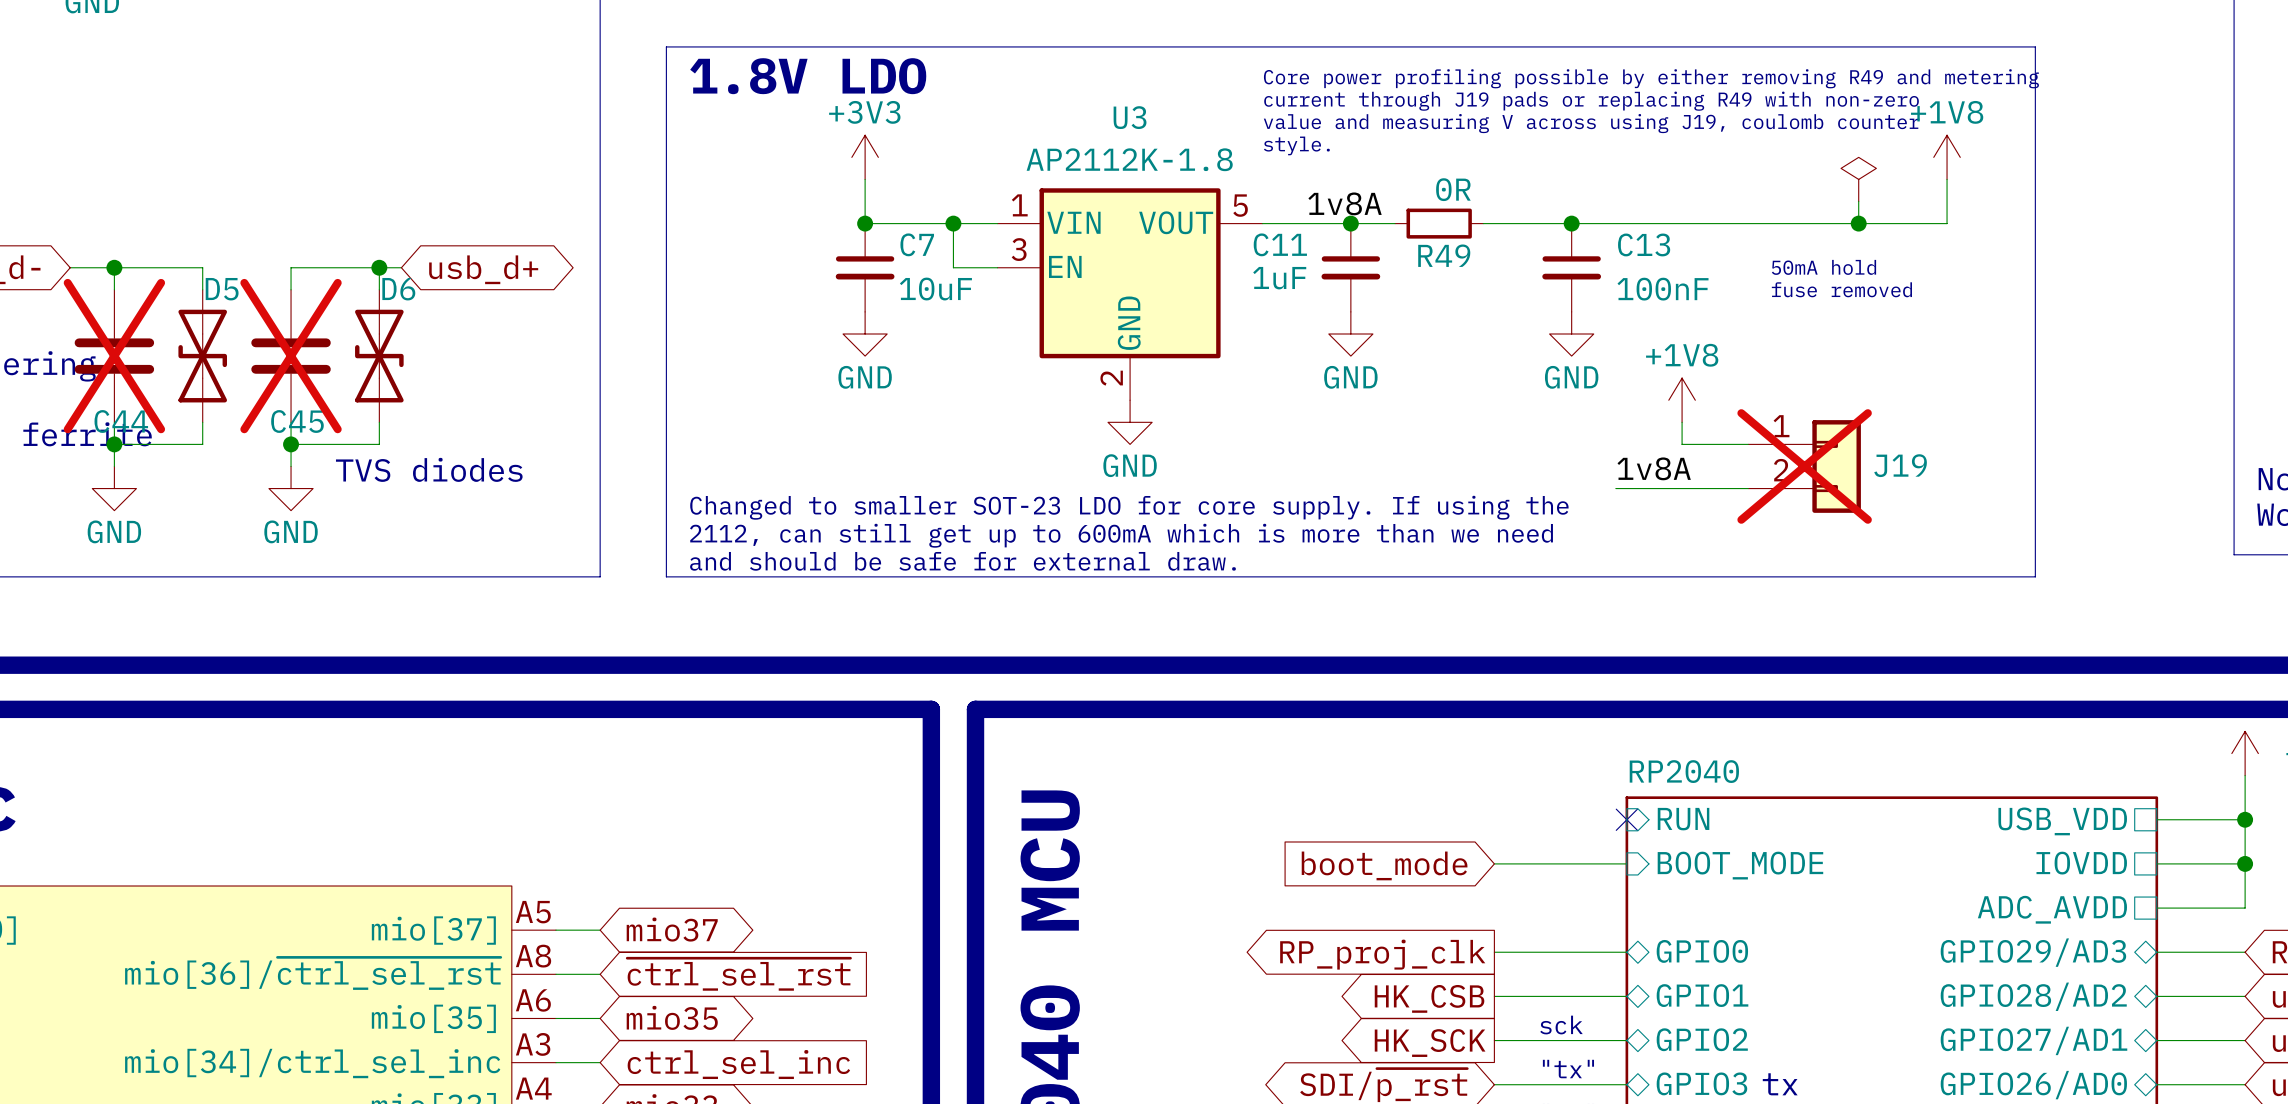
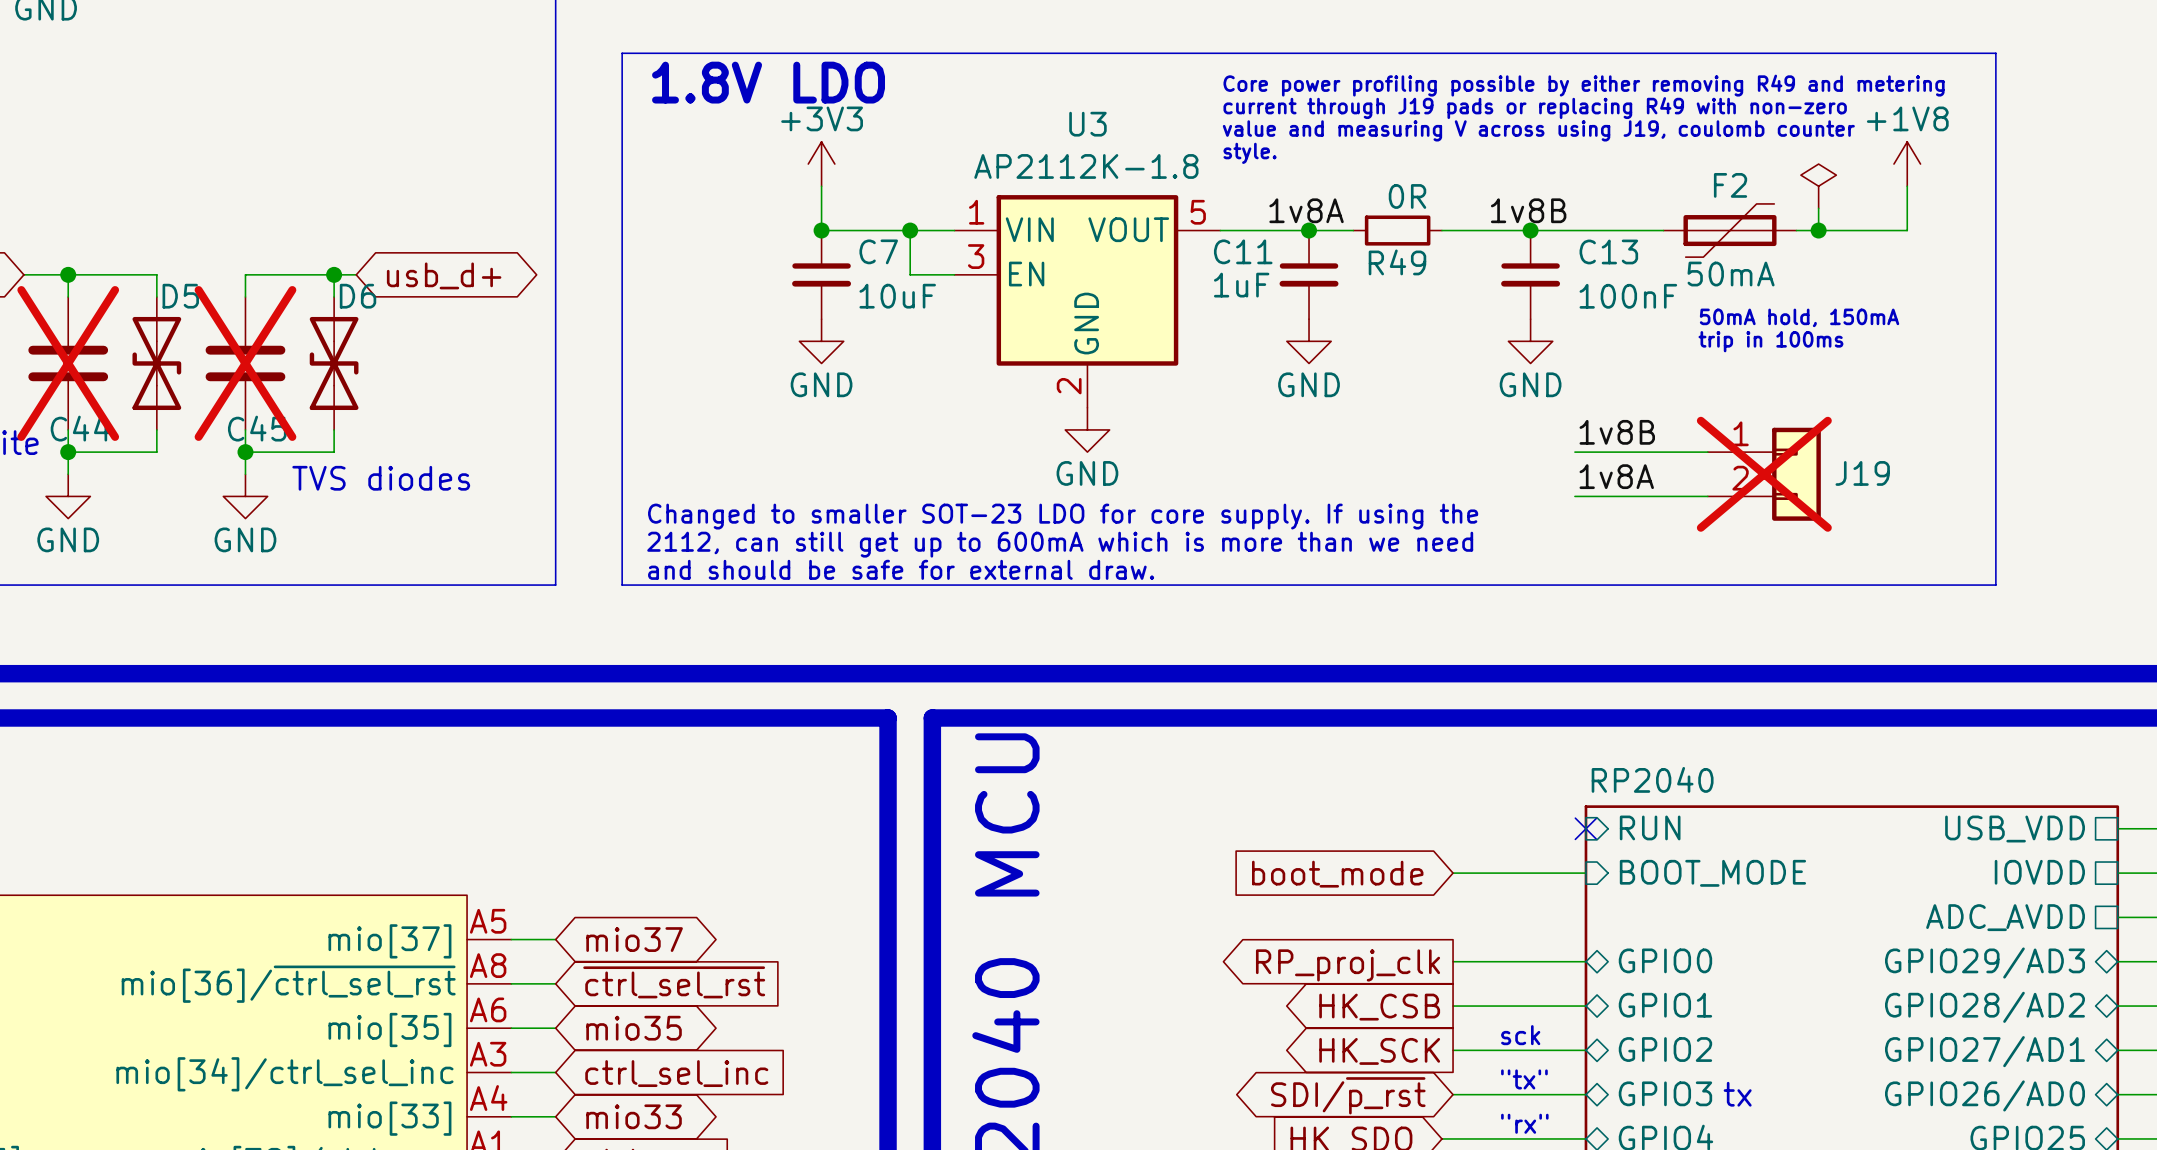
label: none -> 1v8B (1528, 210)
F2: none -> 50mA (1730, 230)
text: 50mA hold (1823, 267) -> none
text: fuse removed (1841, 289) -> none
text: none -> 50mA hold, 150mA (1799, 317)
text: none -> trip in 100ms (1770, 341)
power symbol: +1V8 (1682, 400) -> none
wire: (1682, 422) (1682, 444) -> (1574, 452) (1641, 452)
label: none -> 1v8B (1617, 432)

